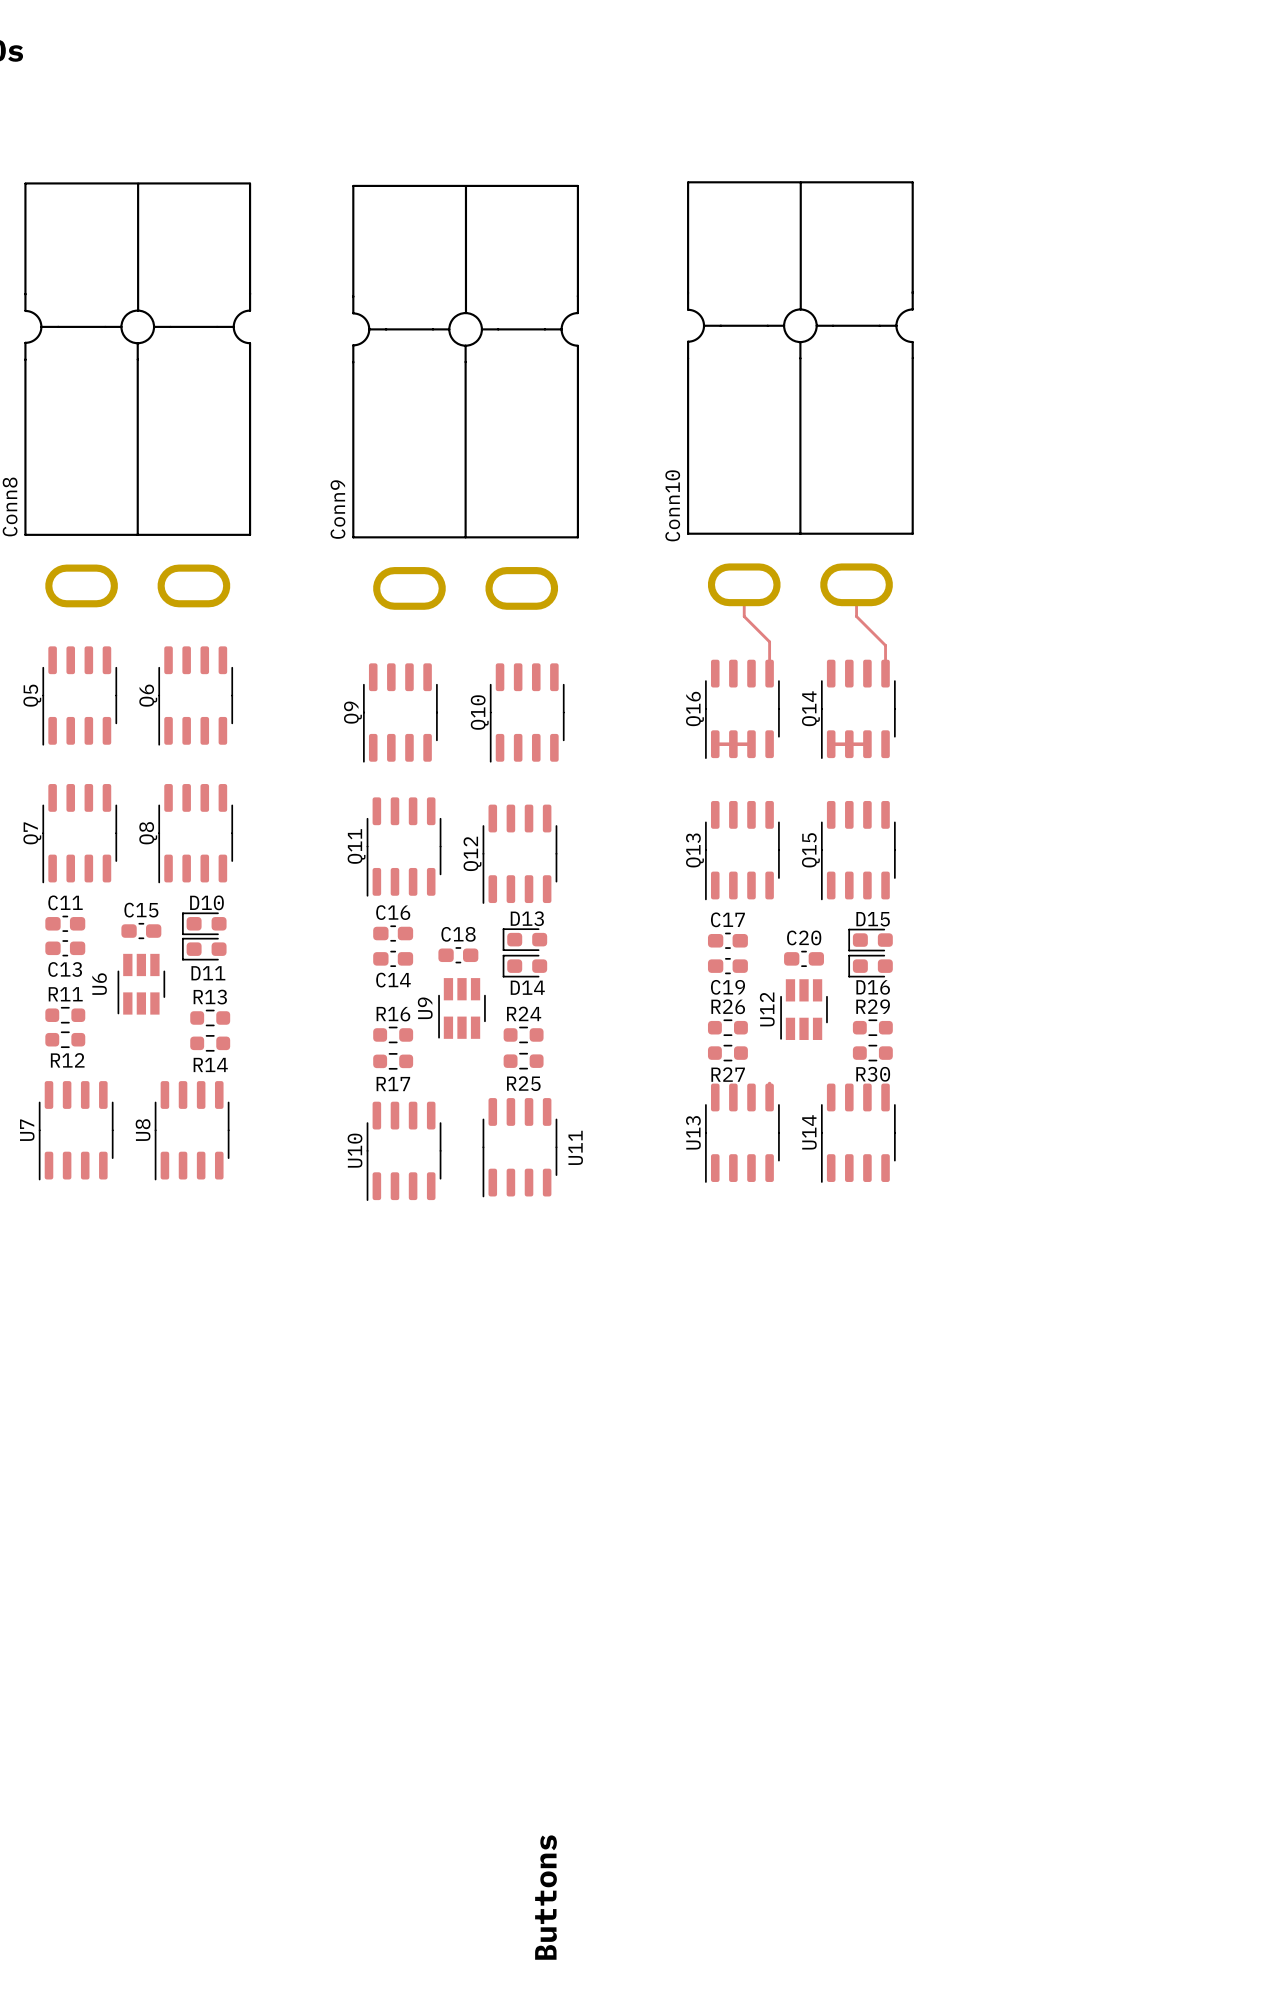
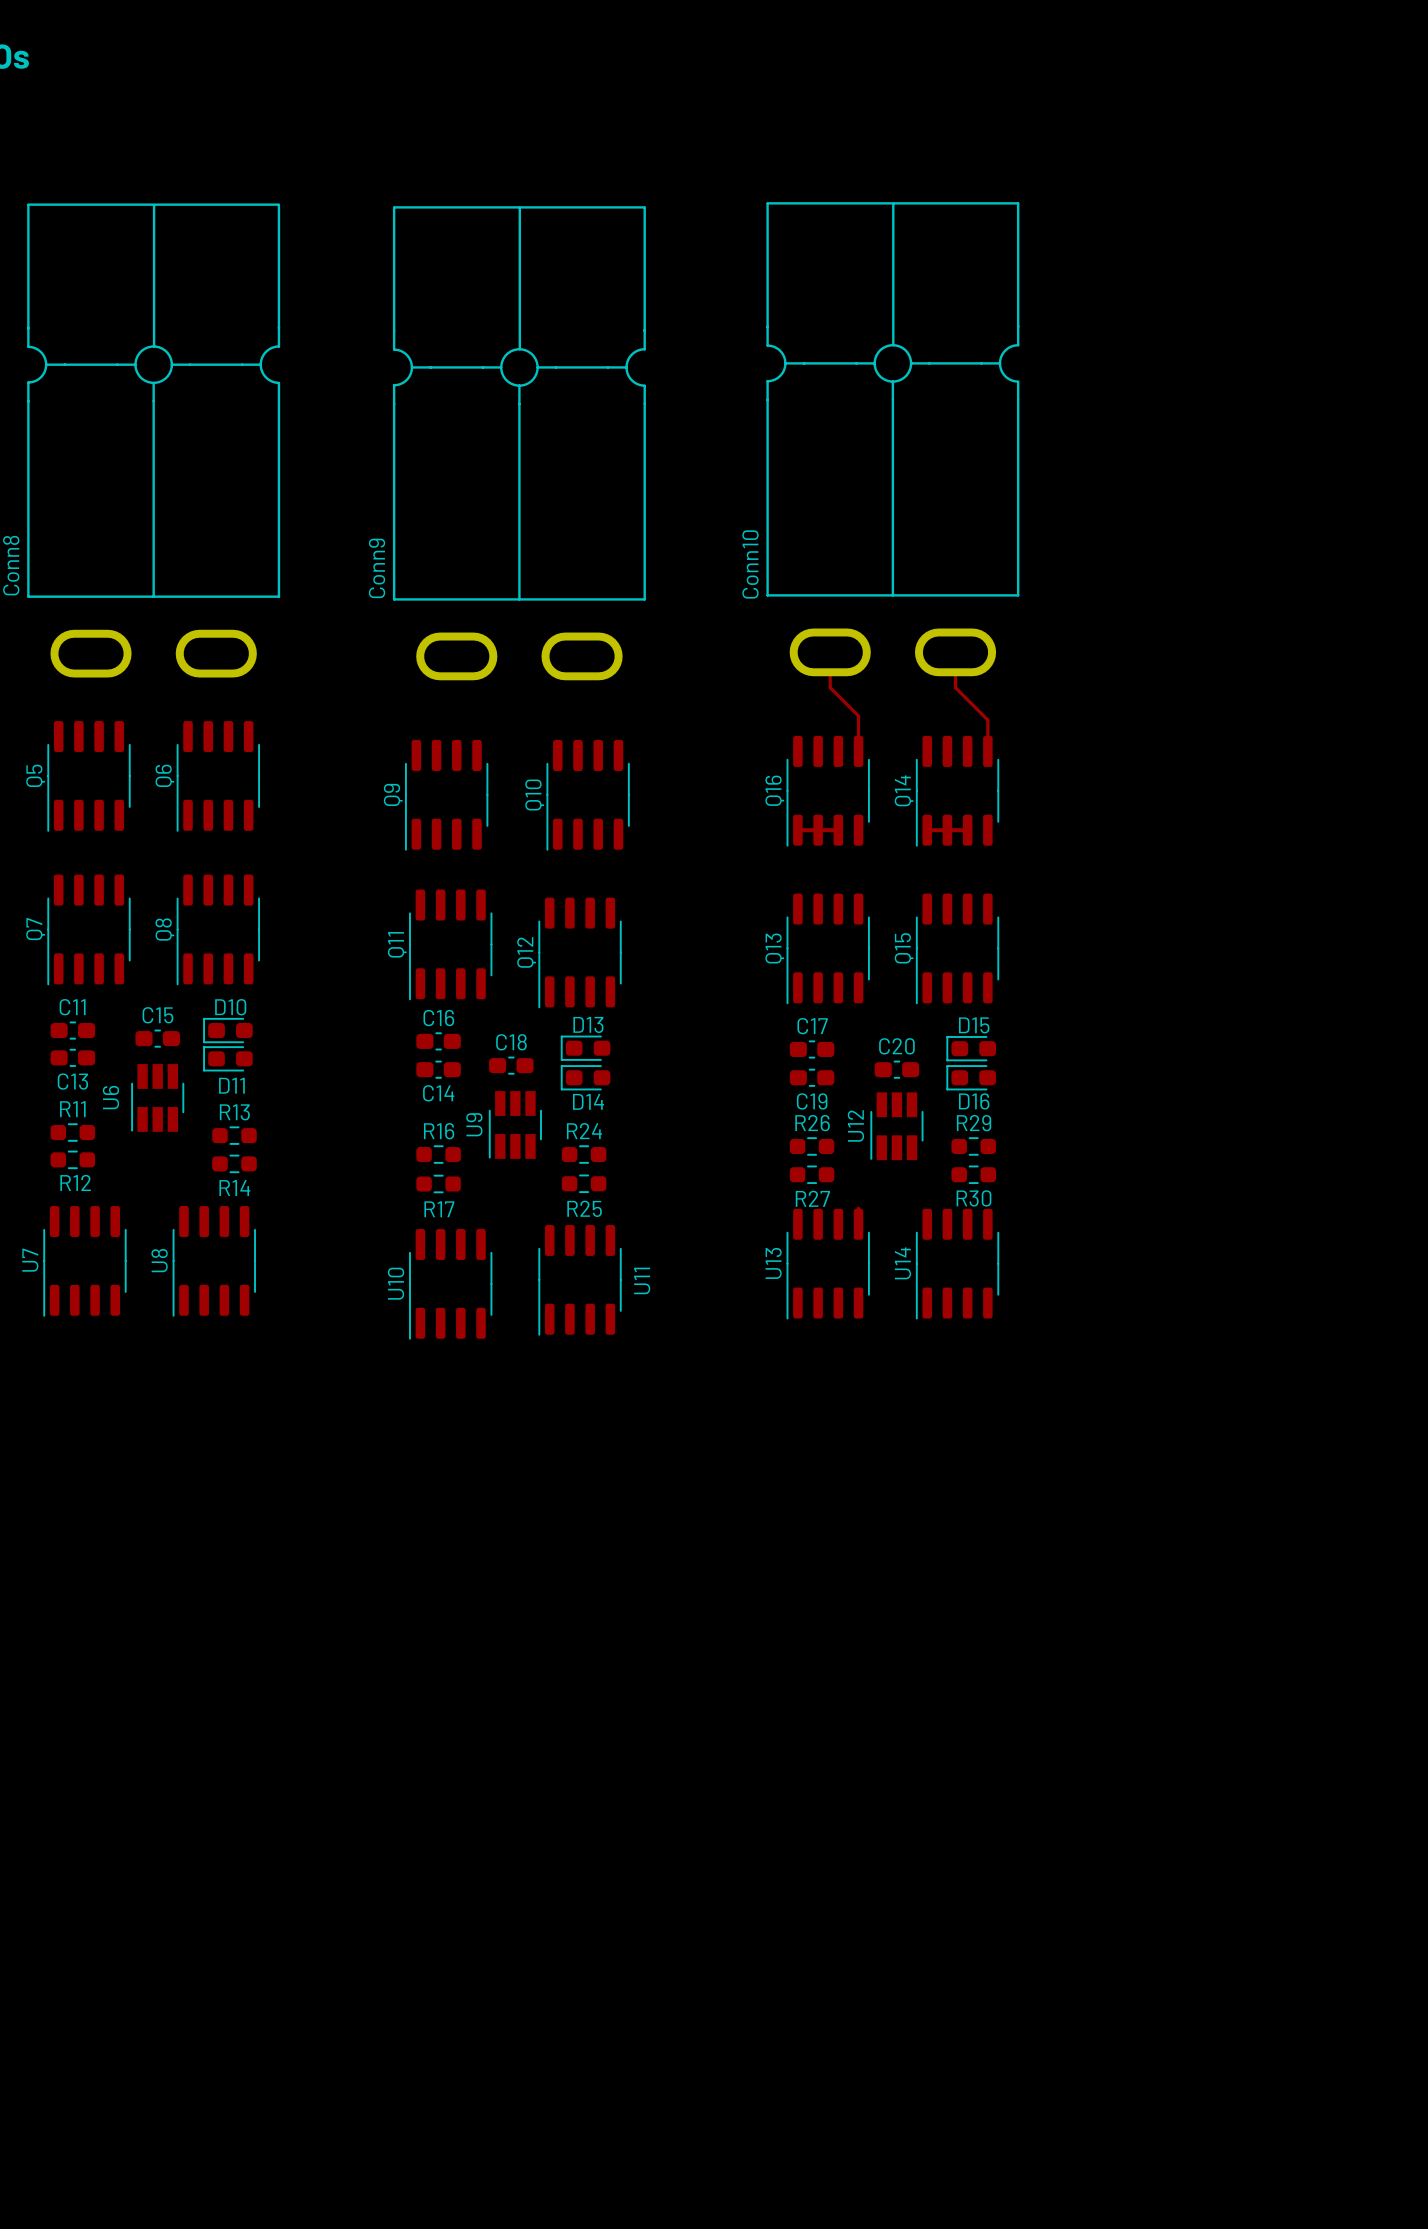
text: Buttons (546, 1897) -> none

